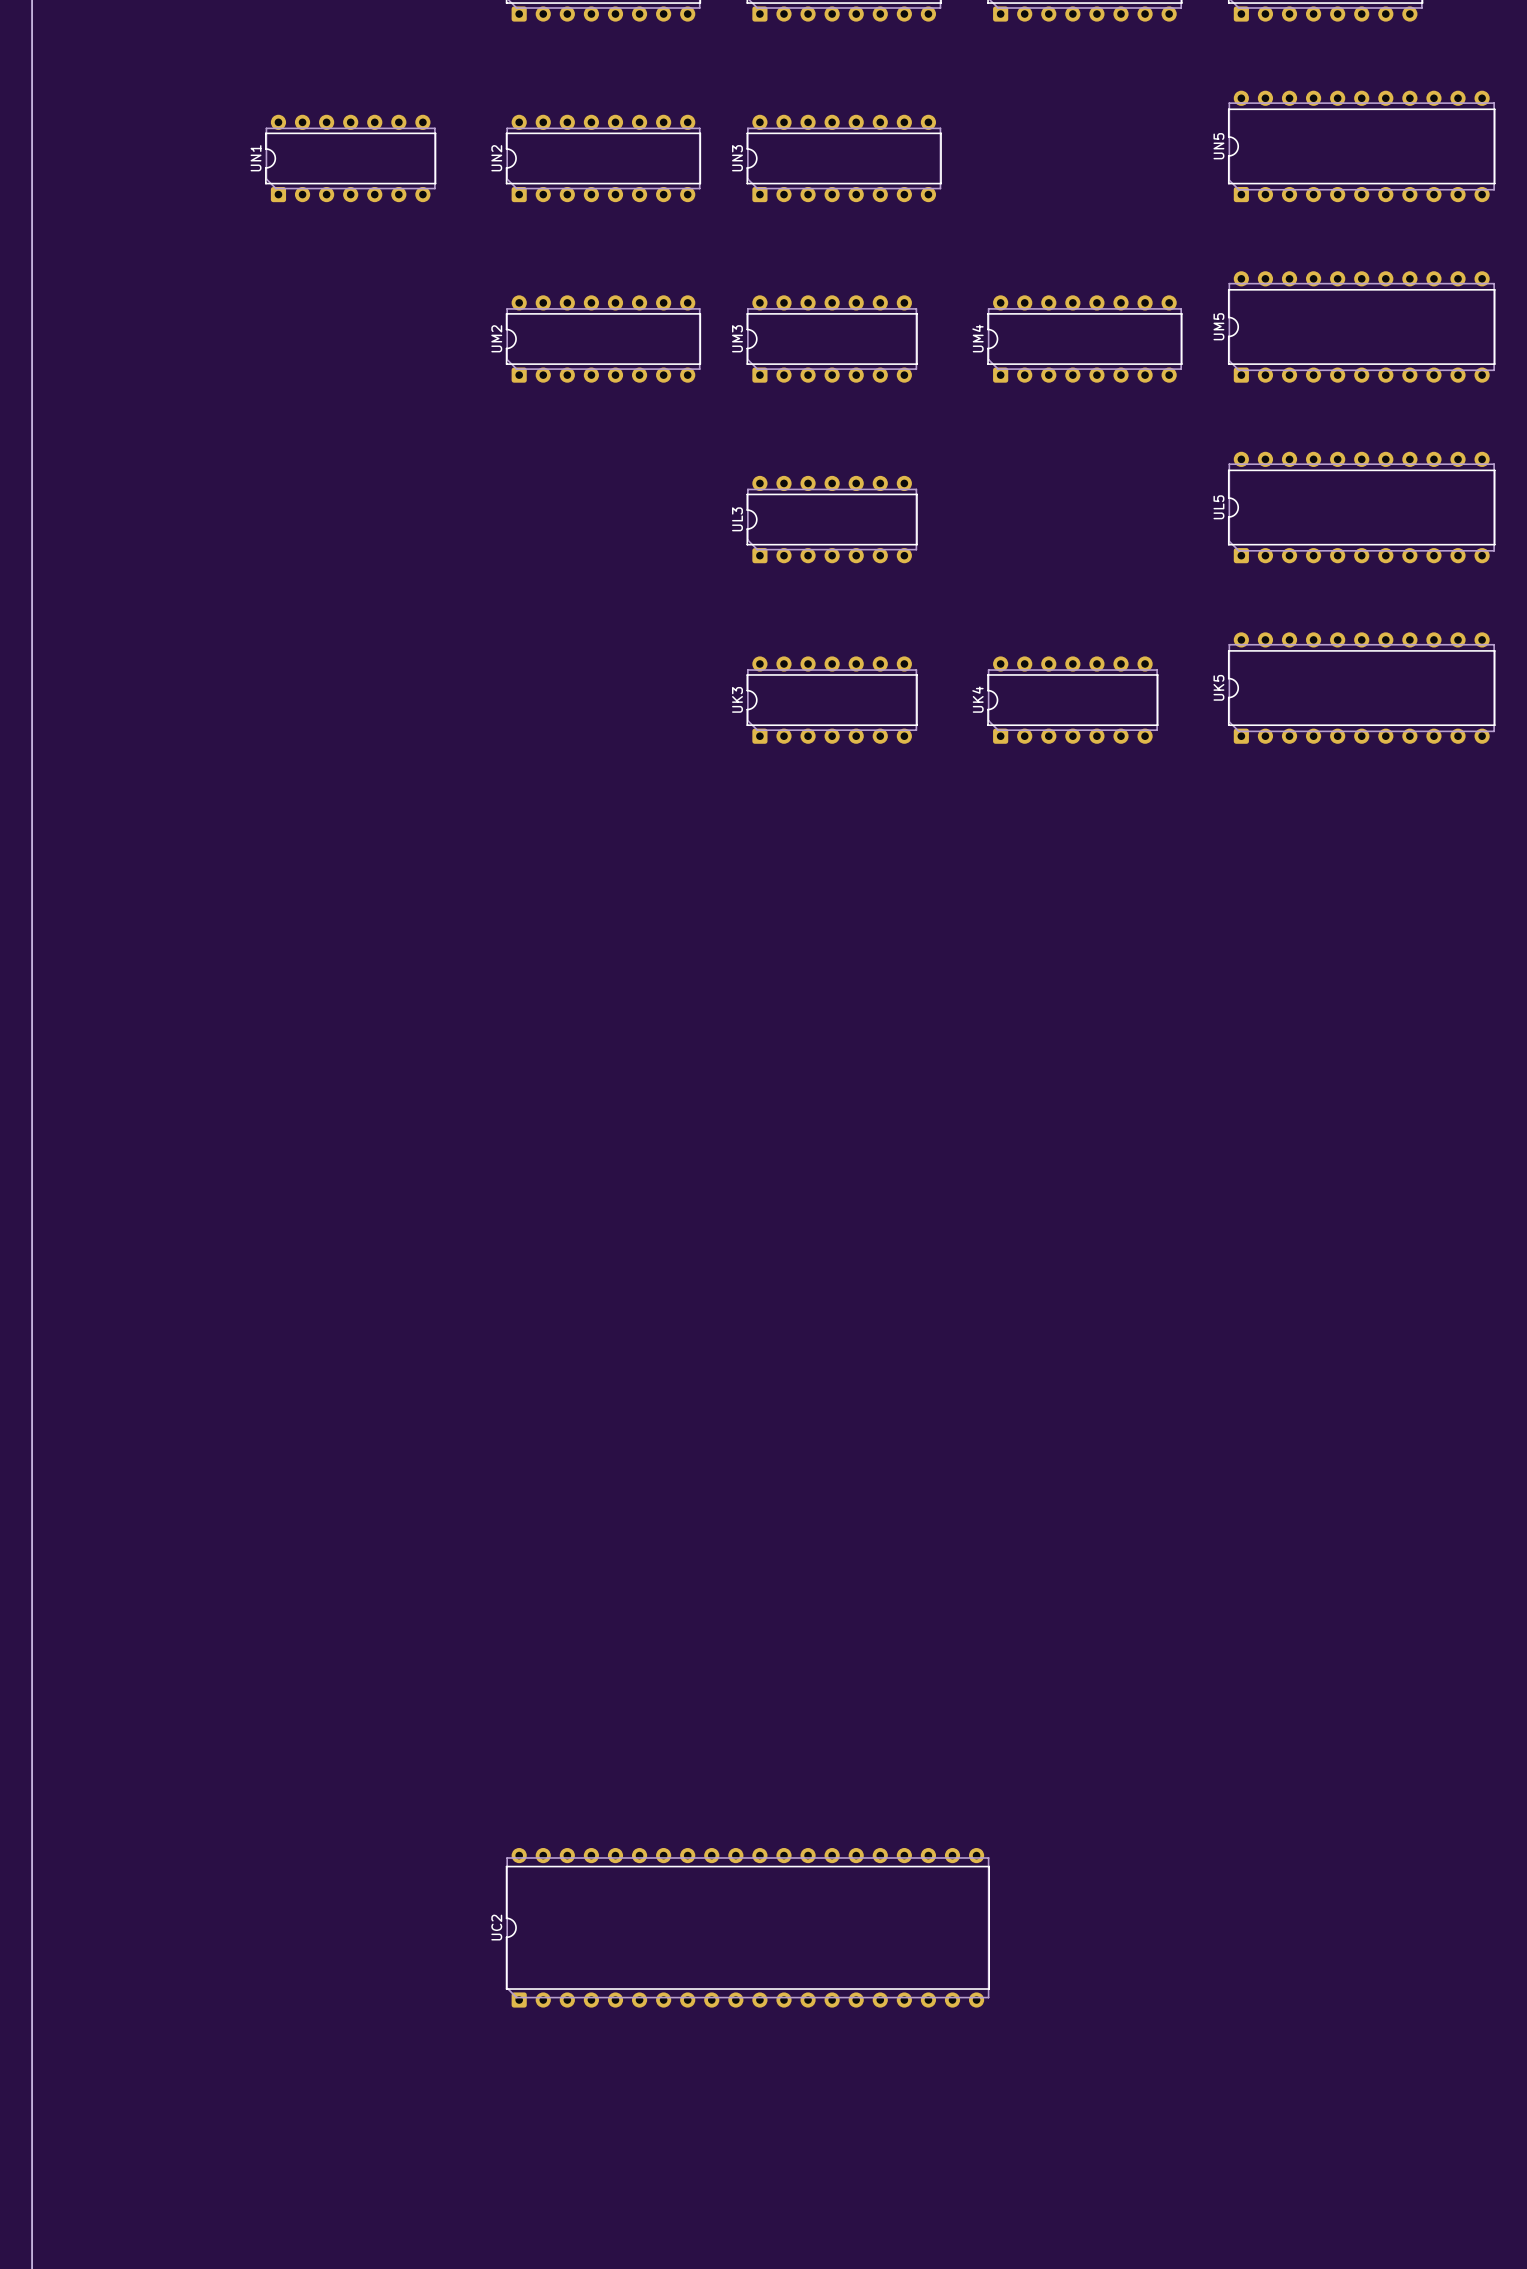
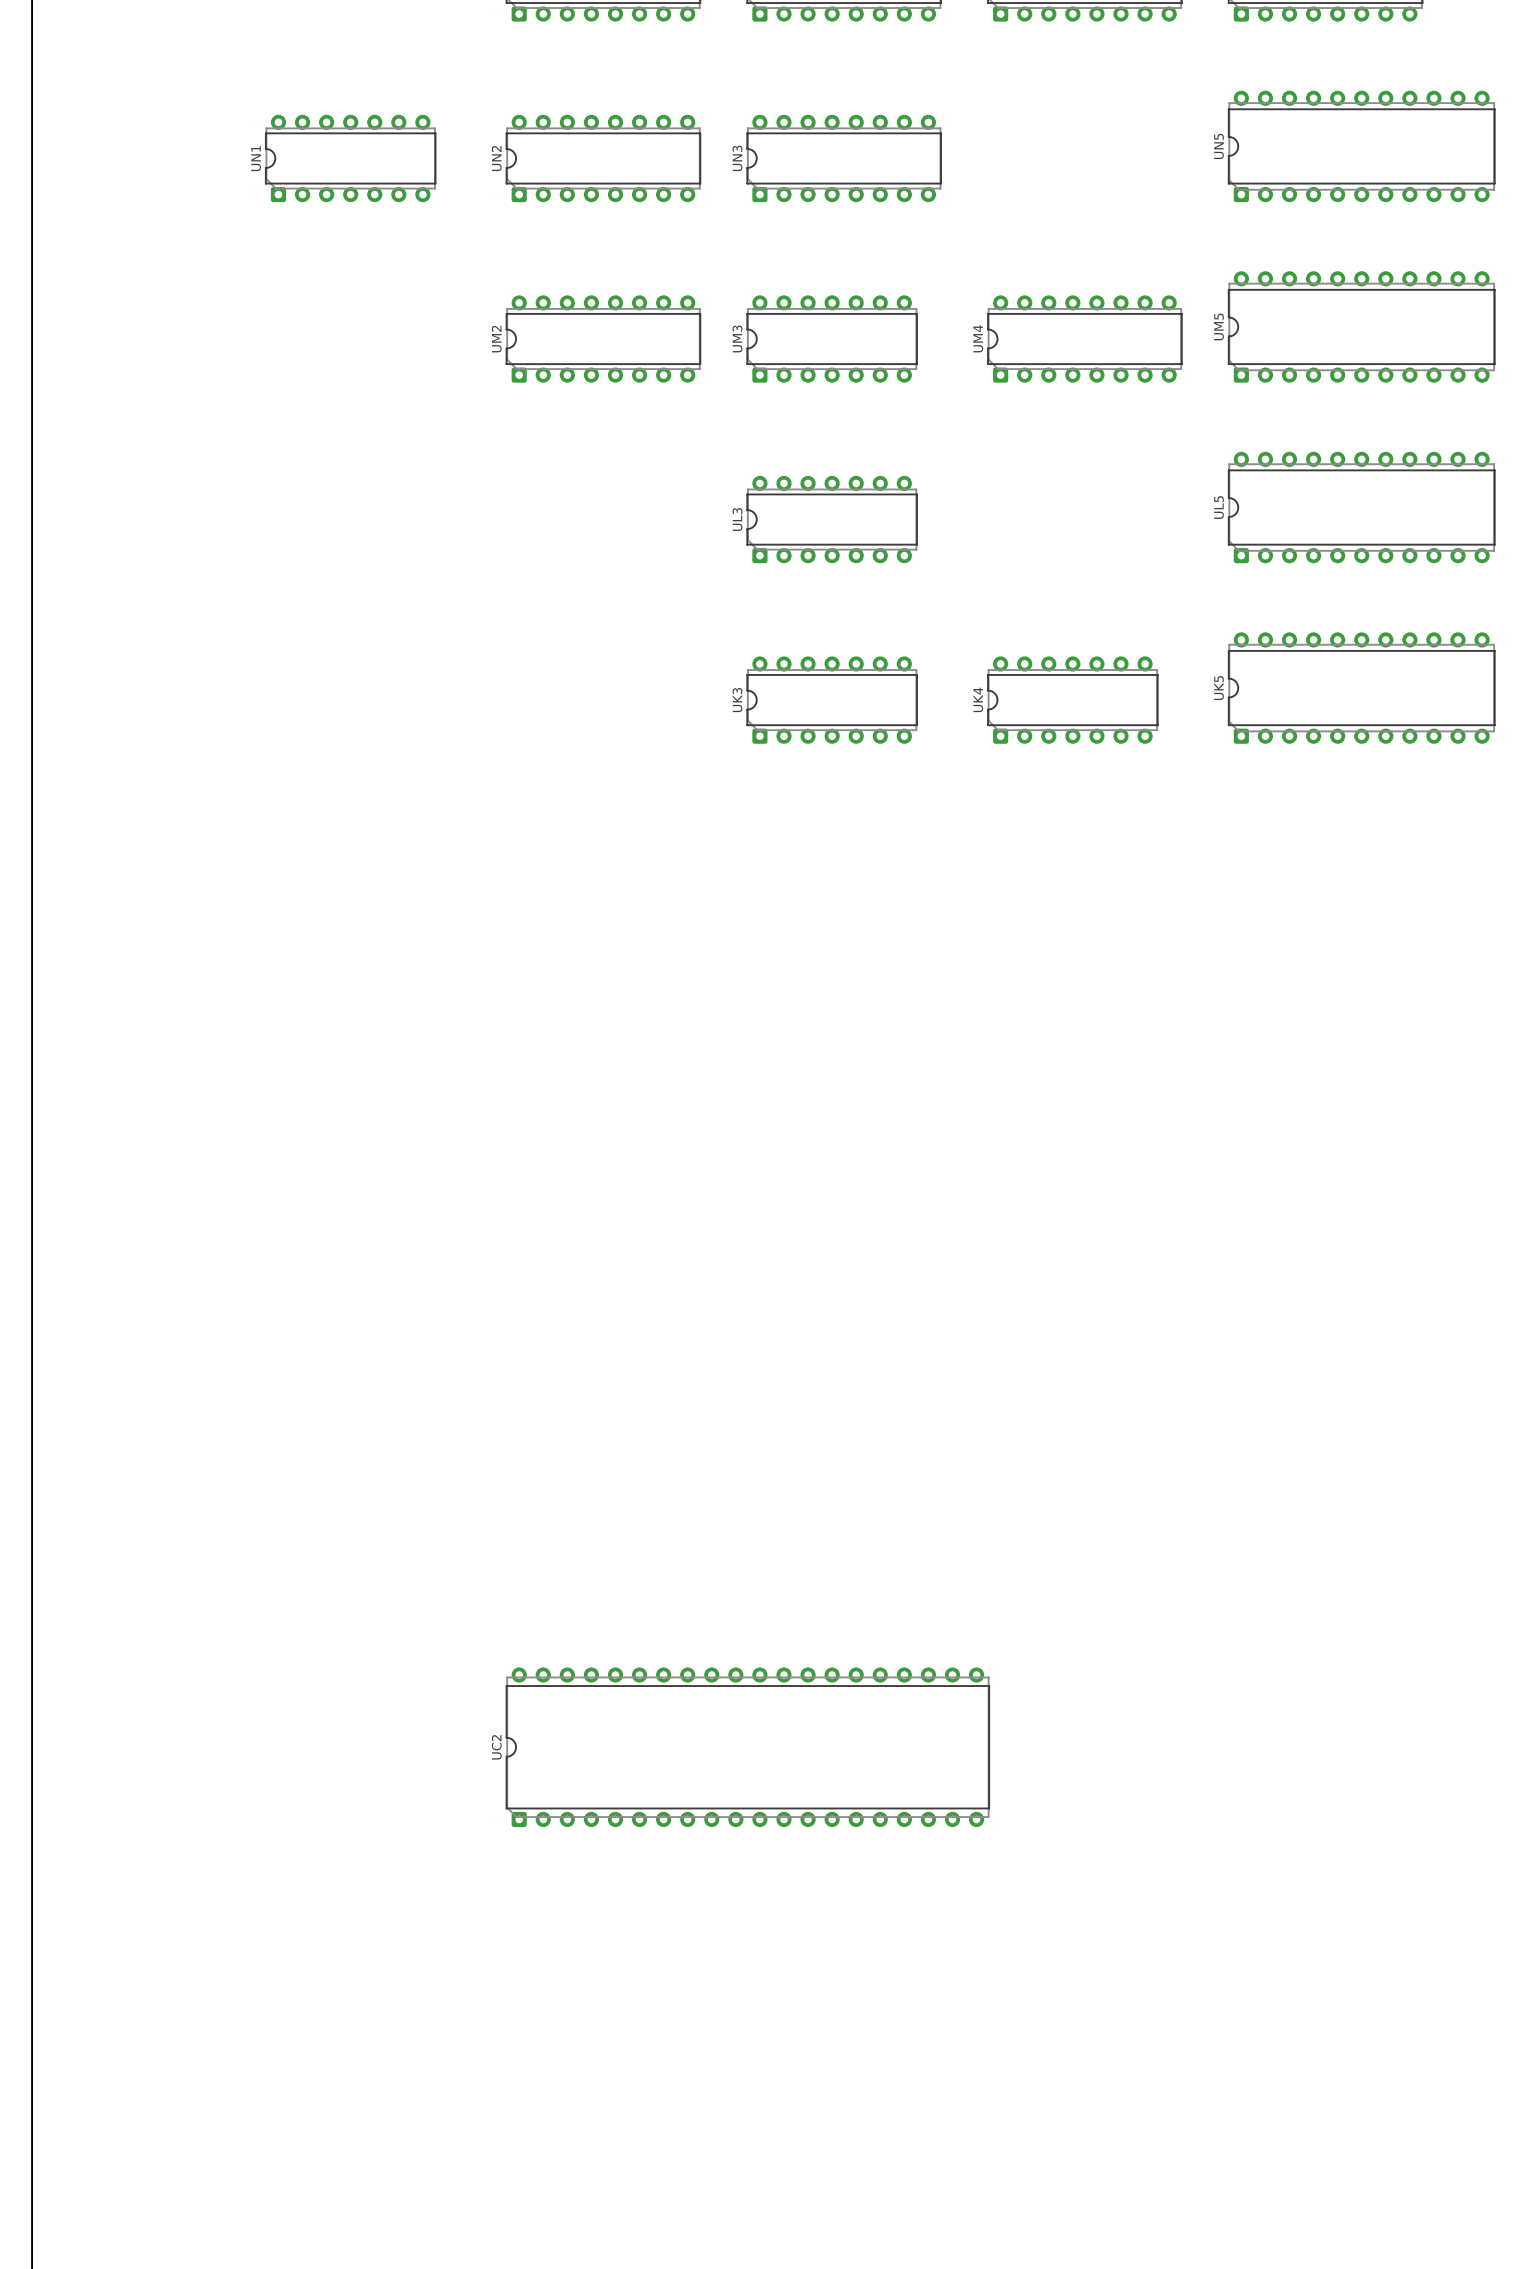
UC2 position: (747, 1927) -> (747, 1747)

